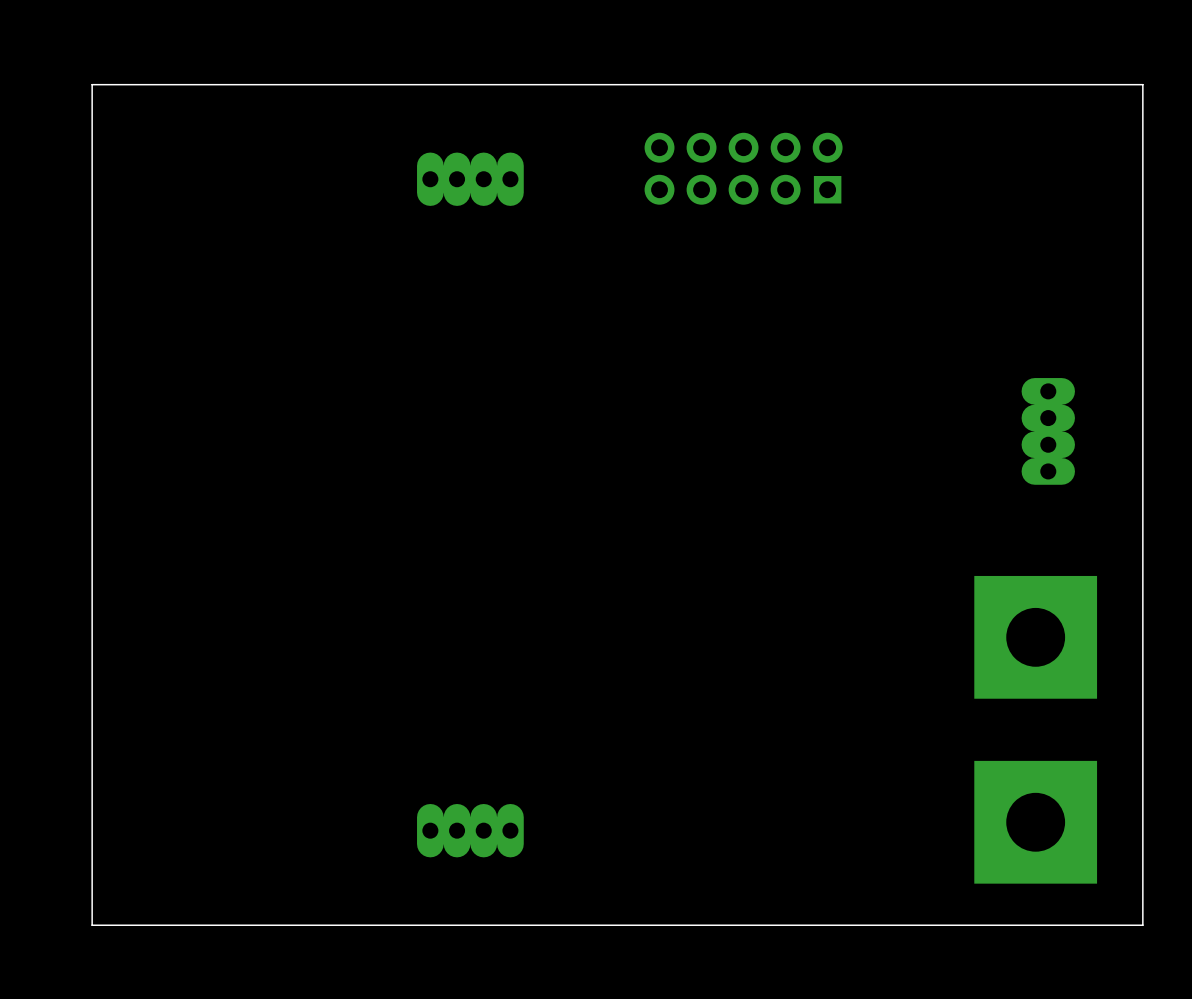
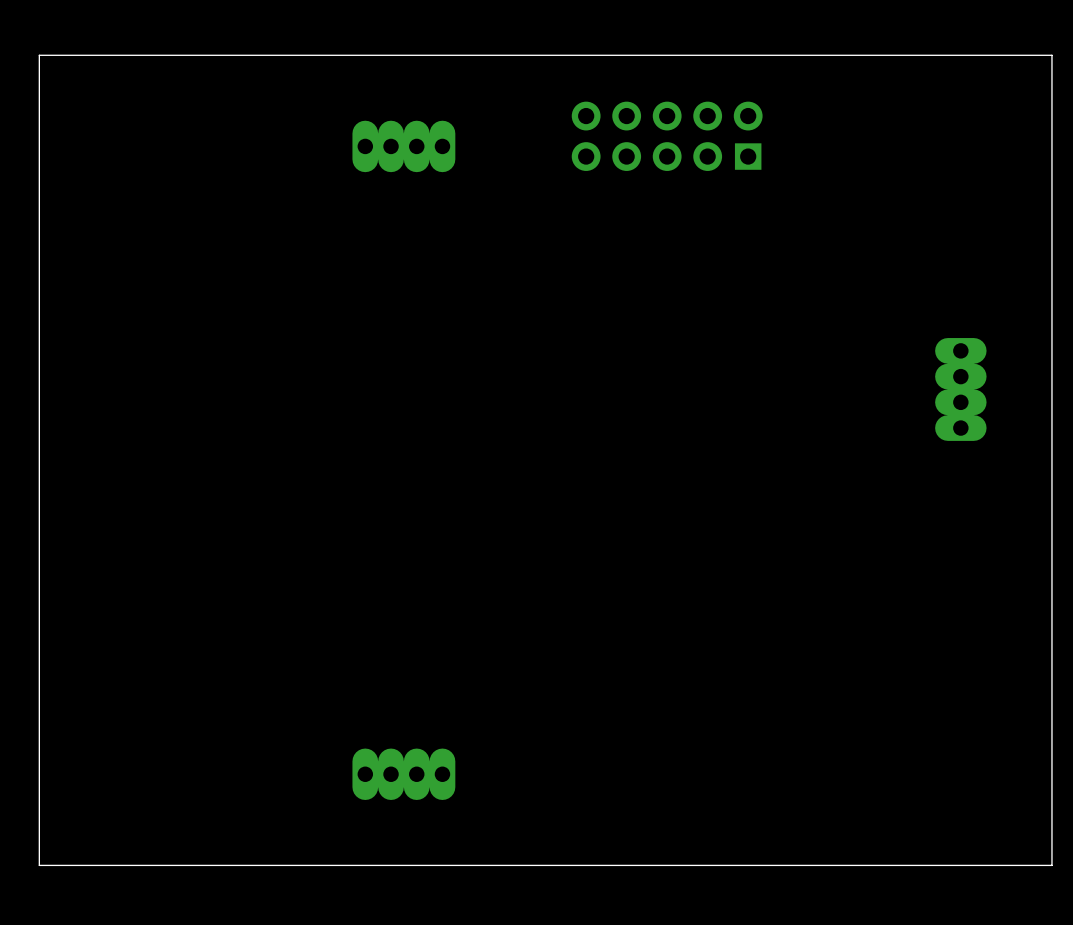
part: (1035, 637) -> none
part: (1035, 822) -> none

